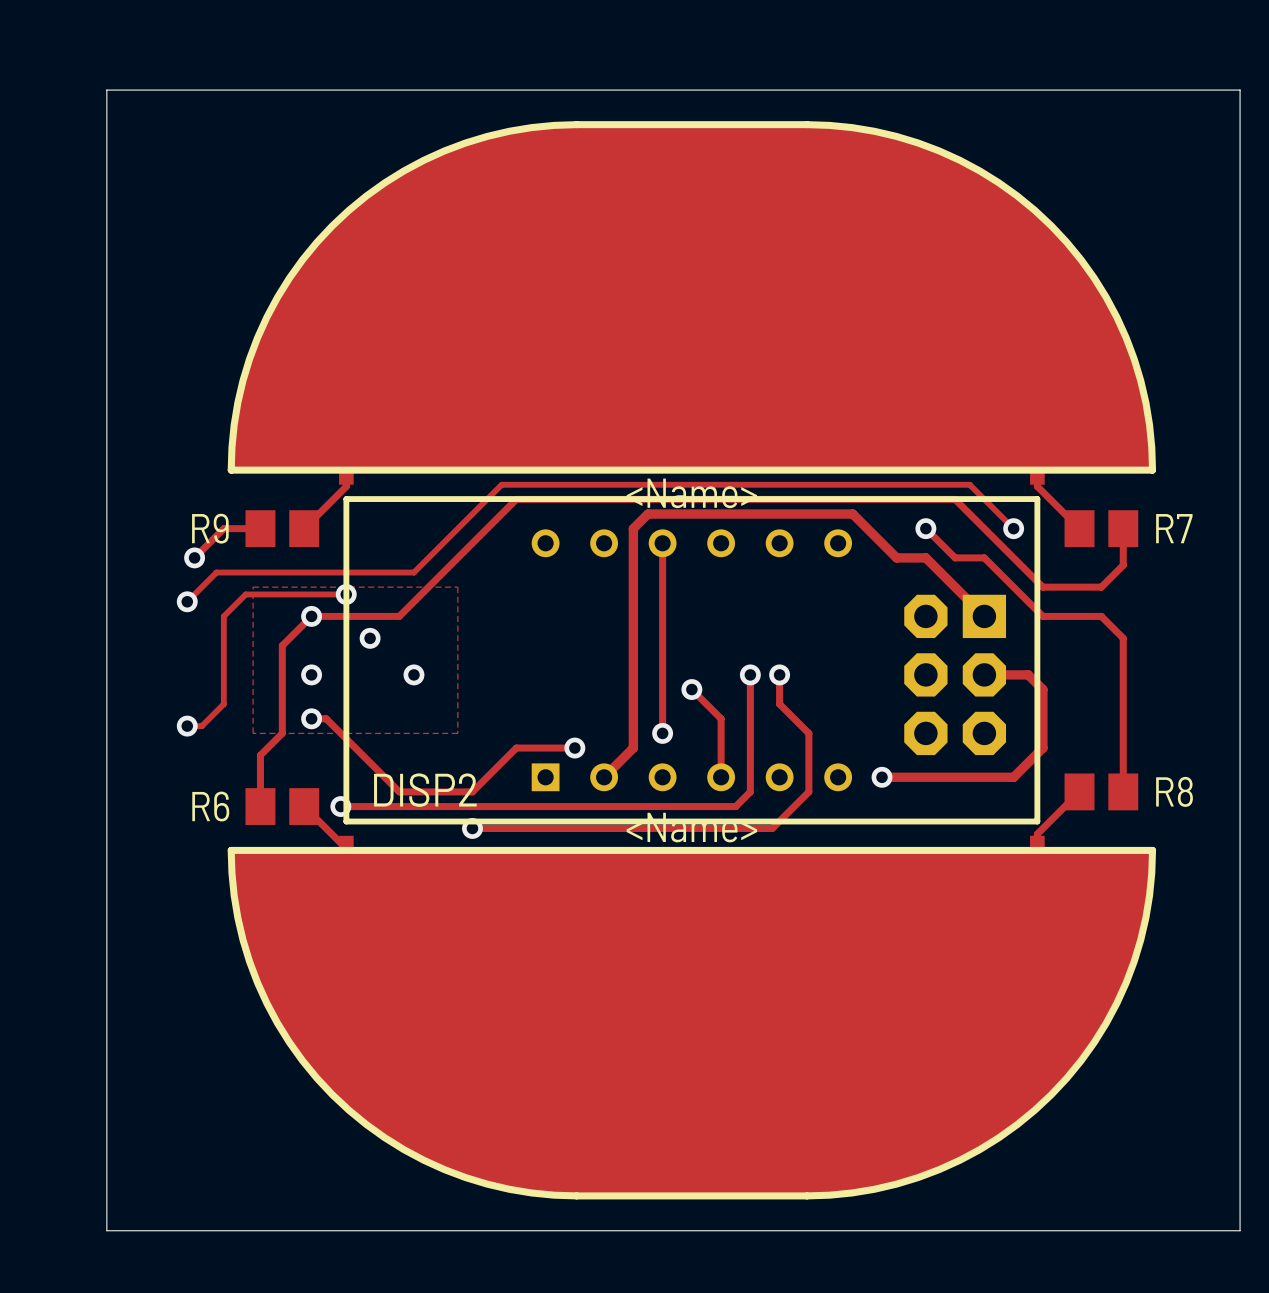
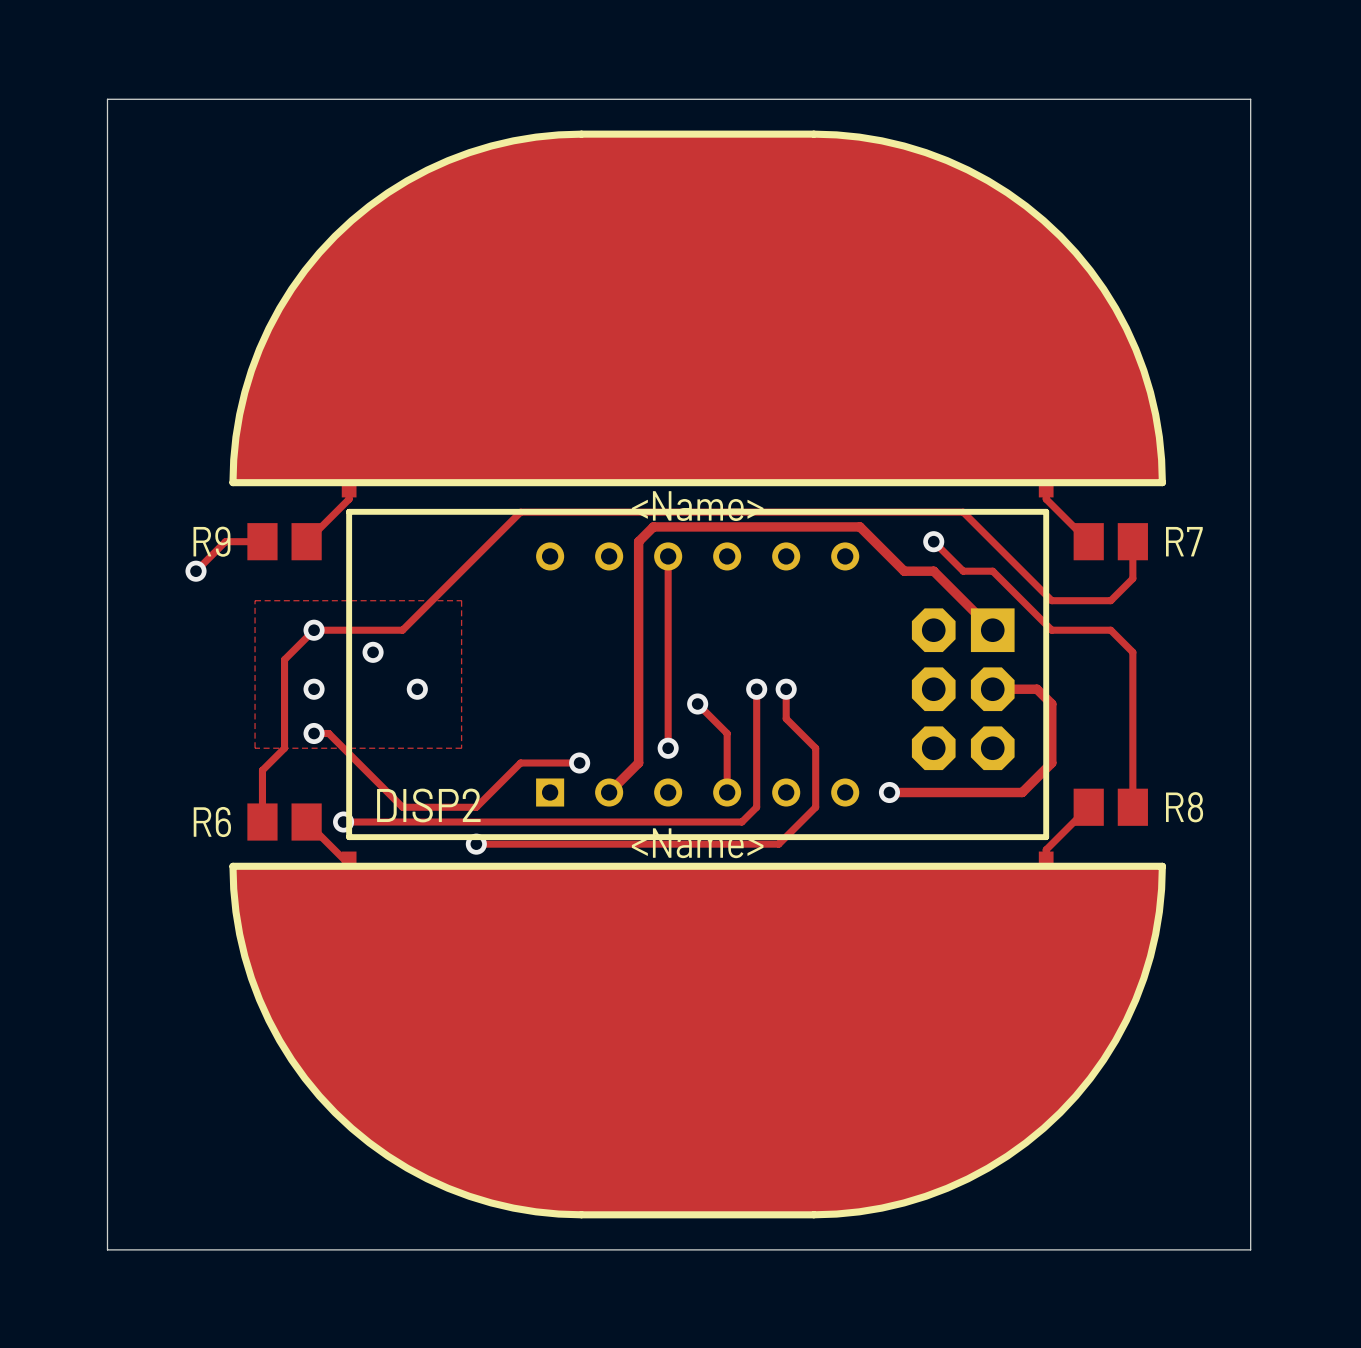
track: (1013, 528) (969, 484) (501, 484) (413, 572) (216, 572) (187, 601) -> none
via: (1013, 528) -> none
track: (346, 594) (245, 594) (223, 616) (223, 704) (201, 726) (187, 726) -> none
via: (346, 594) -> none
via: (187, 601) -> none
via: (187, 726) -> none

